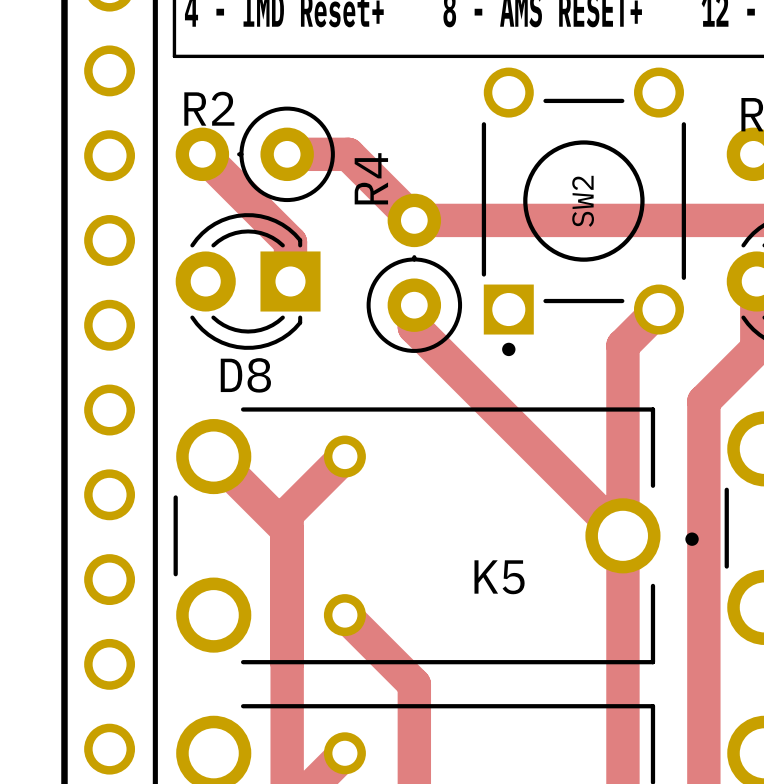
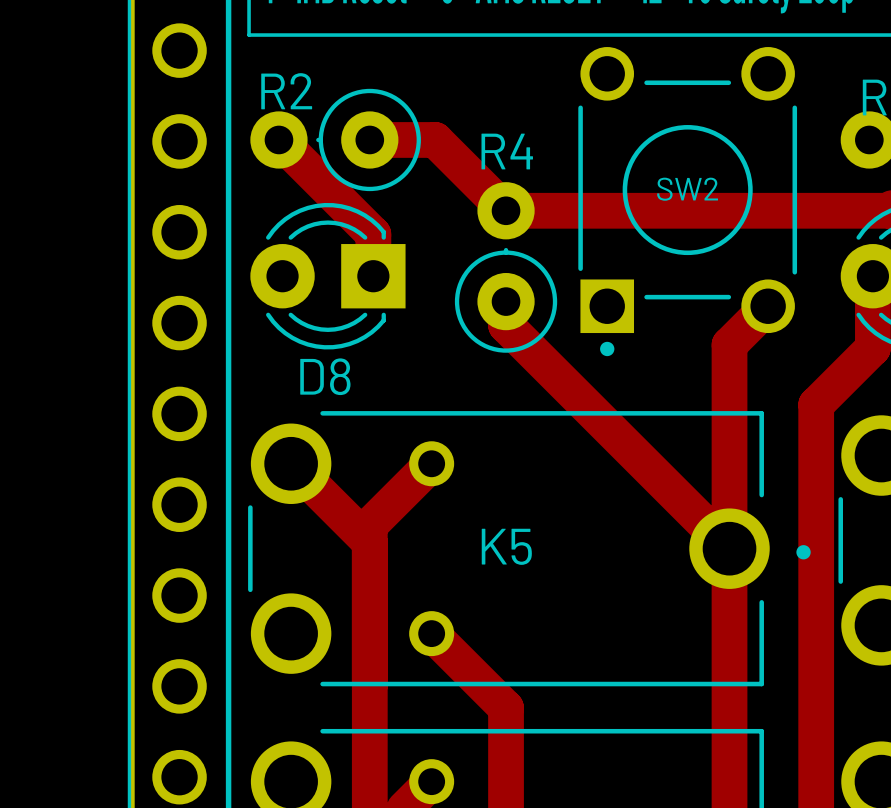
R4 name rotation: 0° (371, 178) -> 90° clockwise (507, 151)
SW2 name rotation: 0° (583, 201) -> 90° clockwise (687, 189)
K5 name position: K5 (499, 577) -> K5 (506, 546)

